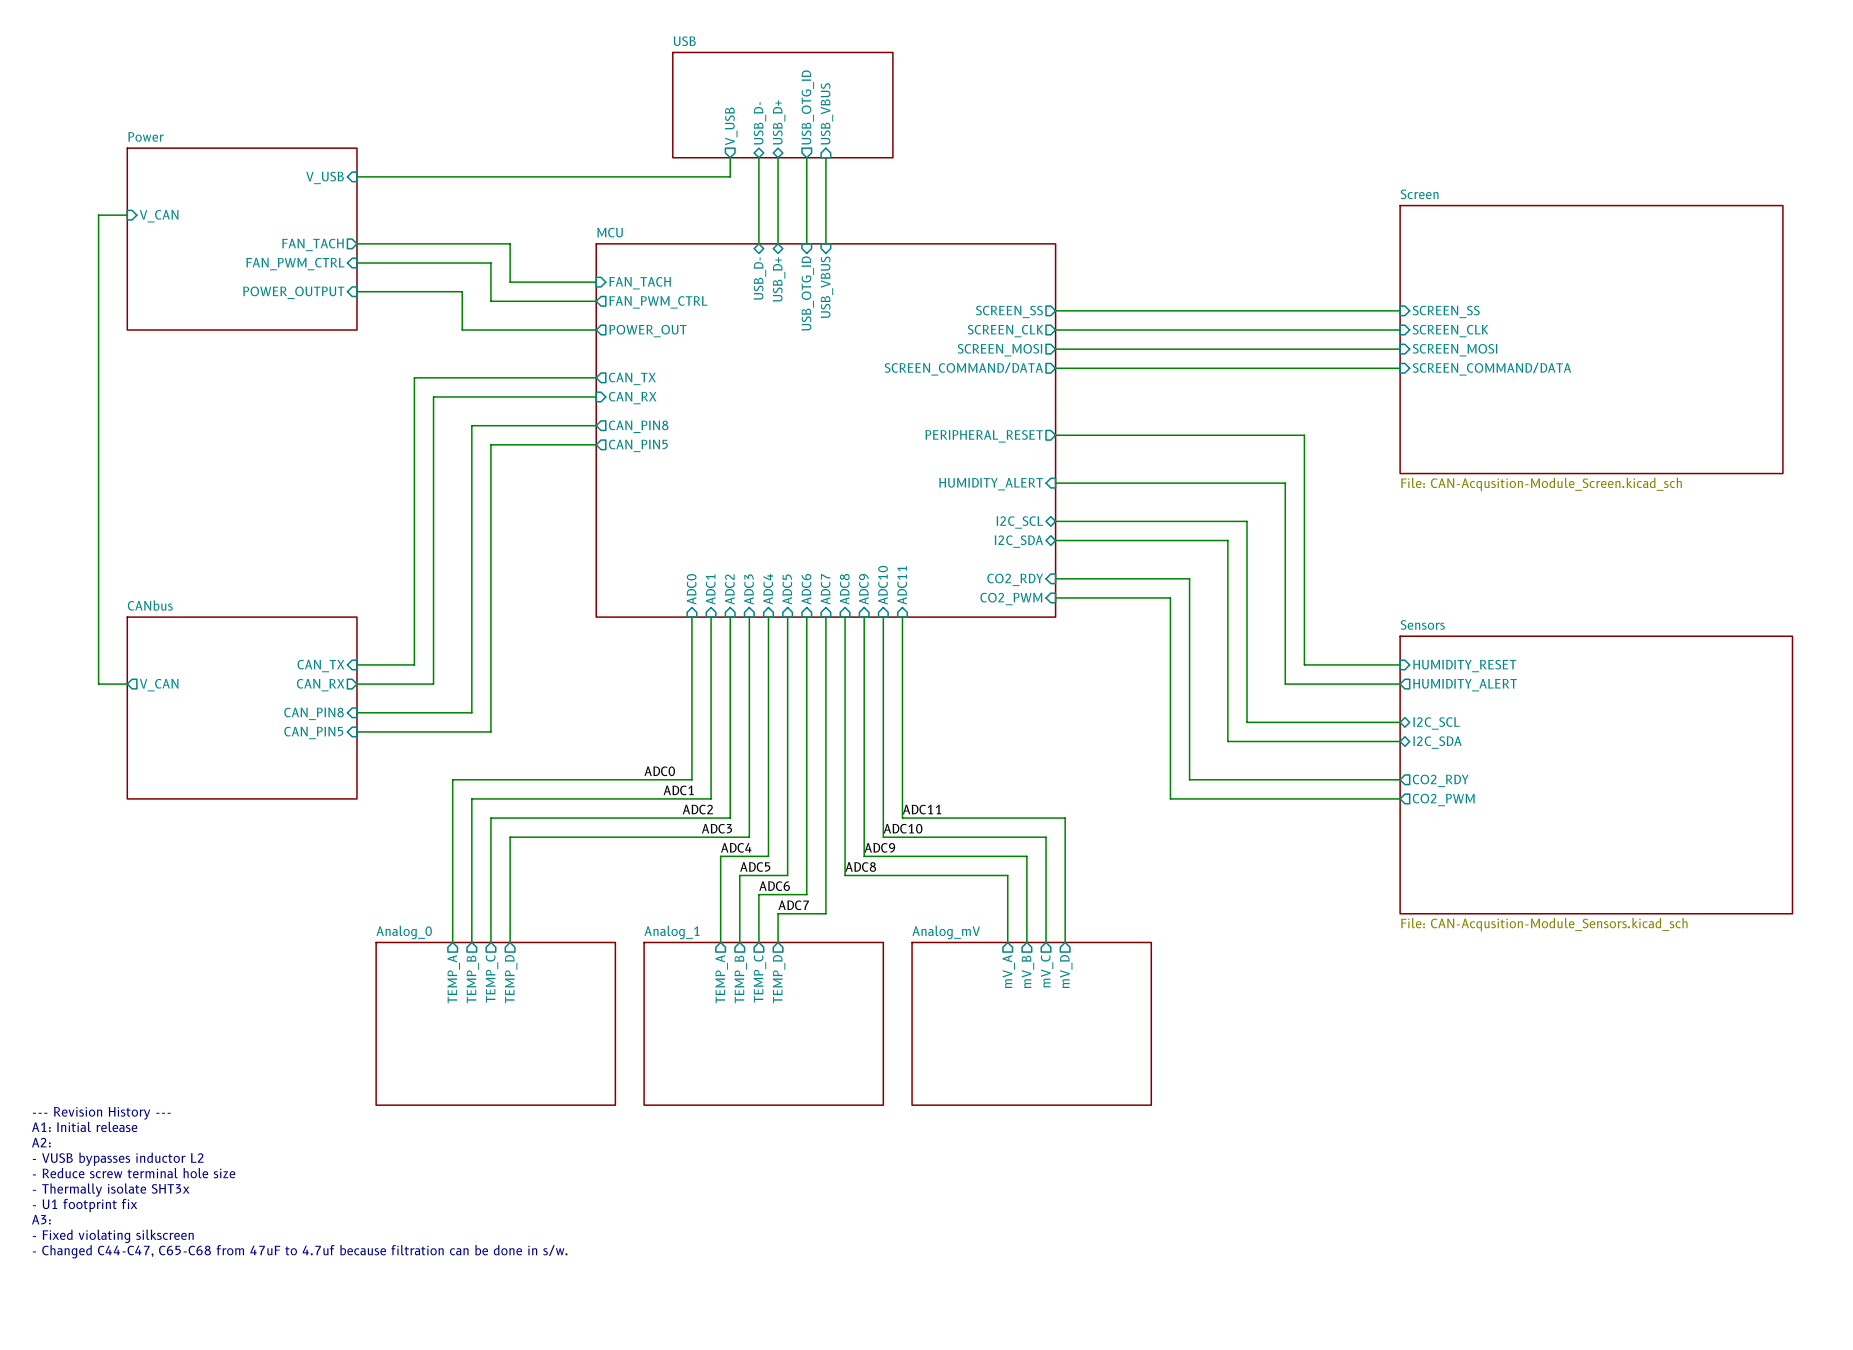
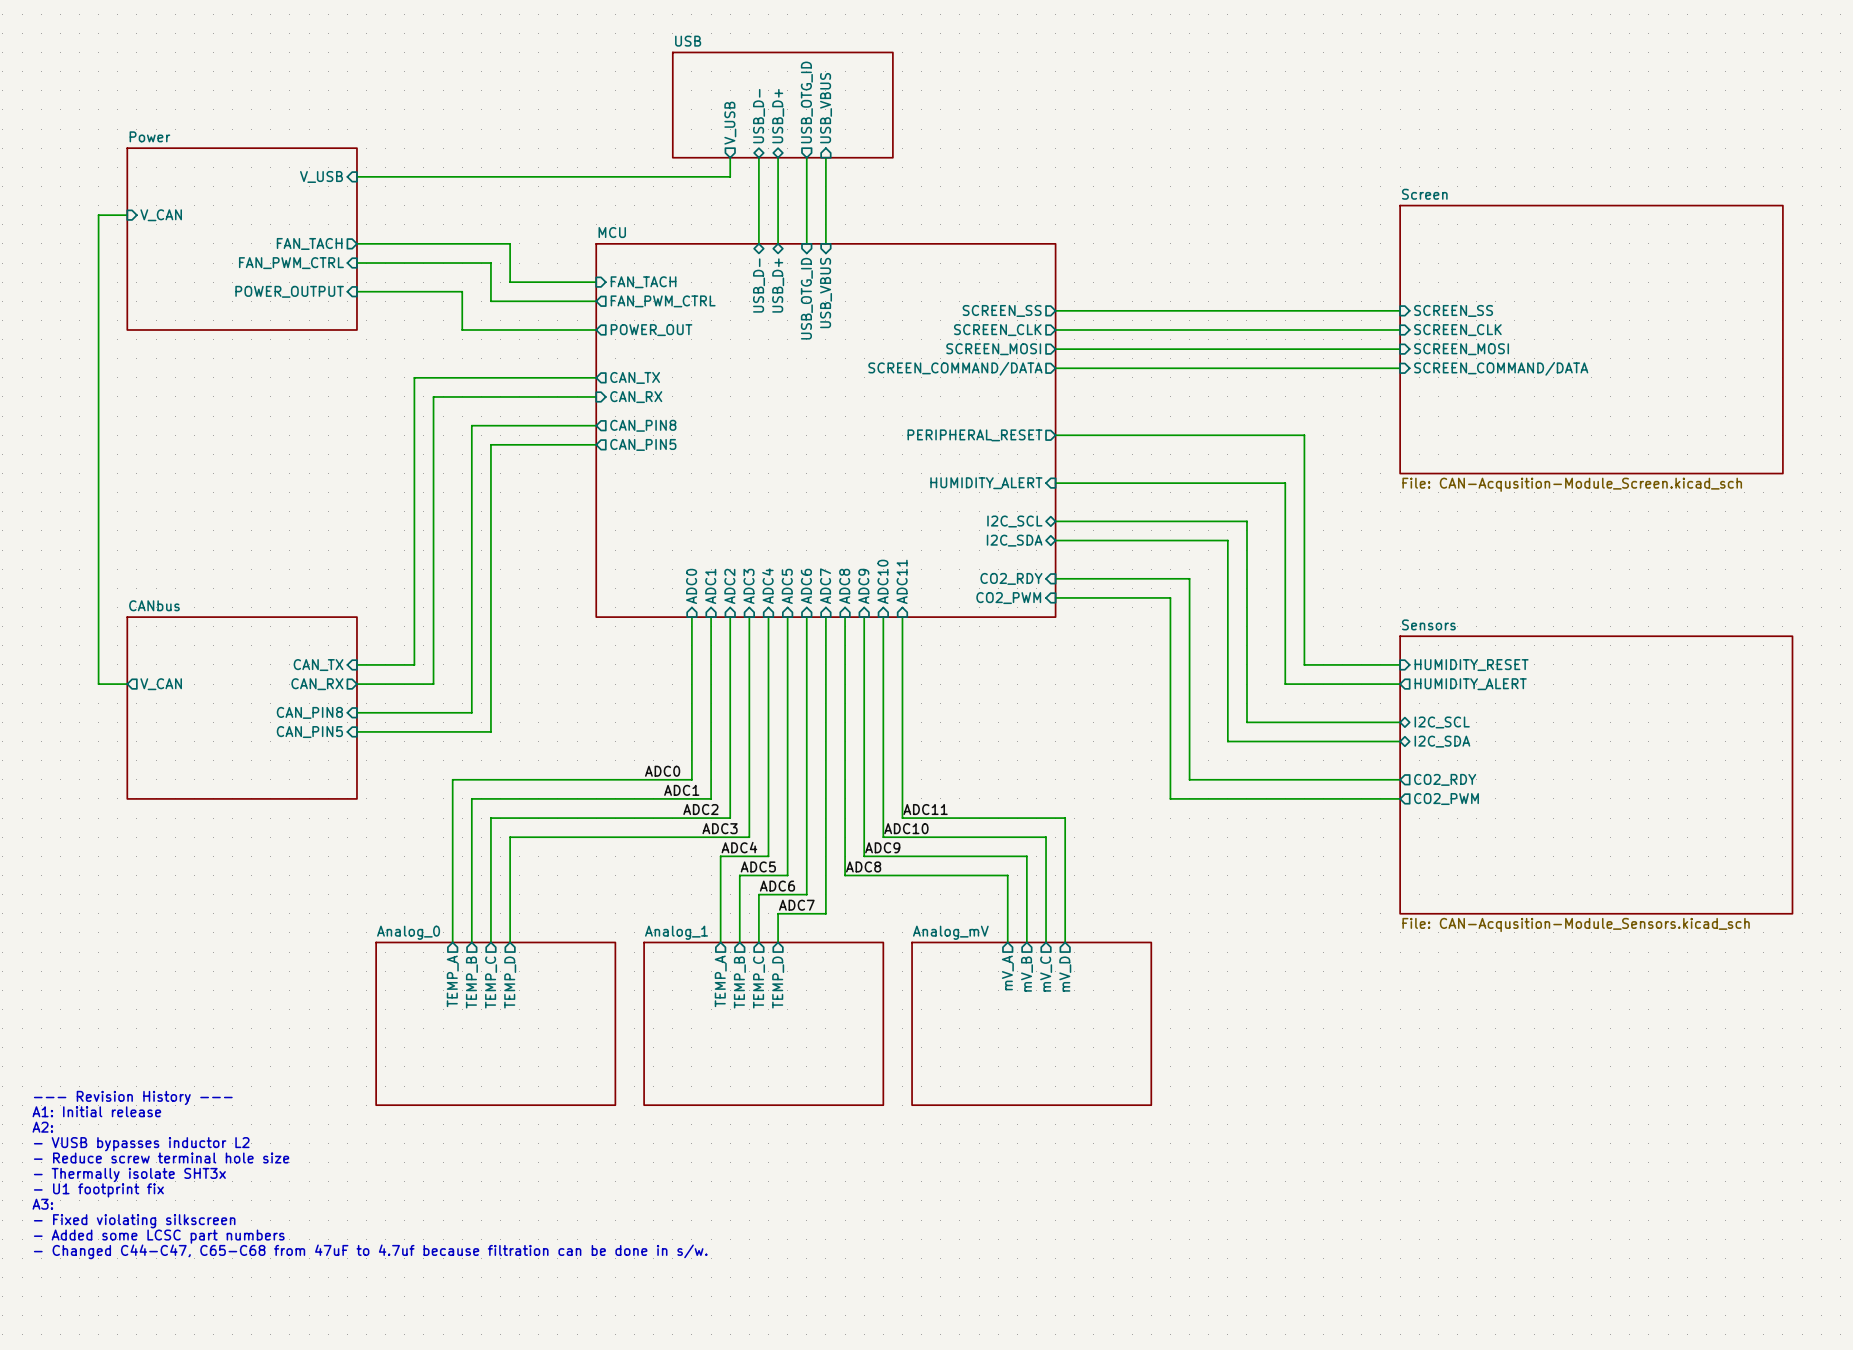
text: none -> --- Revision History --- (133, 1097)
text: --- Revision History --- (101, 1113) -> A1: Initial release (96, 1111)
text: A1: Initial release (84, 1126) -> A2: (42, 1127)
text: A2: (41, 1142) -> - VUSB bypasses inductor L2 (141, 1144)
text: - VUSB bypasses inductor L2 (118, 1159) -> - Reduce screw terminal hole size (161, 1158)
text: - Reduce screw terminal hole size (134, 1173) -> - Thermally isolate SHT3x (129, 1175)
text: - Thermally isolate SHT3x (111, 1190) -> - U1 footprint fix (98, 1190)
text: - U1 footprint fix (85, 1205) -> A3: (42, 1204)
text: A3: (41, 1219) -> - Fixed violating silkscreen (134, 1221)
text: - Fixed violating silkscreen (113, 1236) -> - Added some LCSC part numbers (159, 1236)

